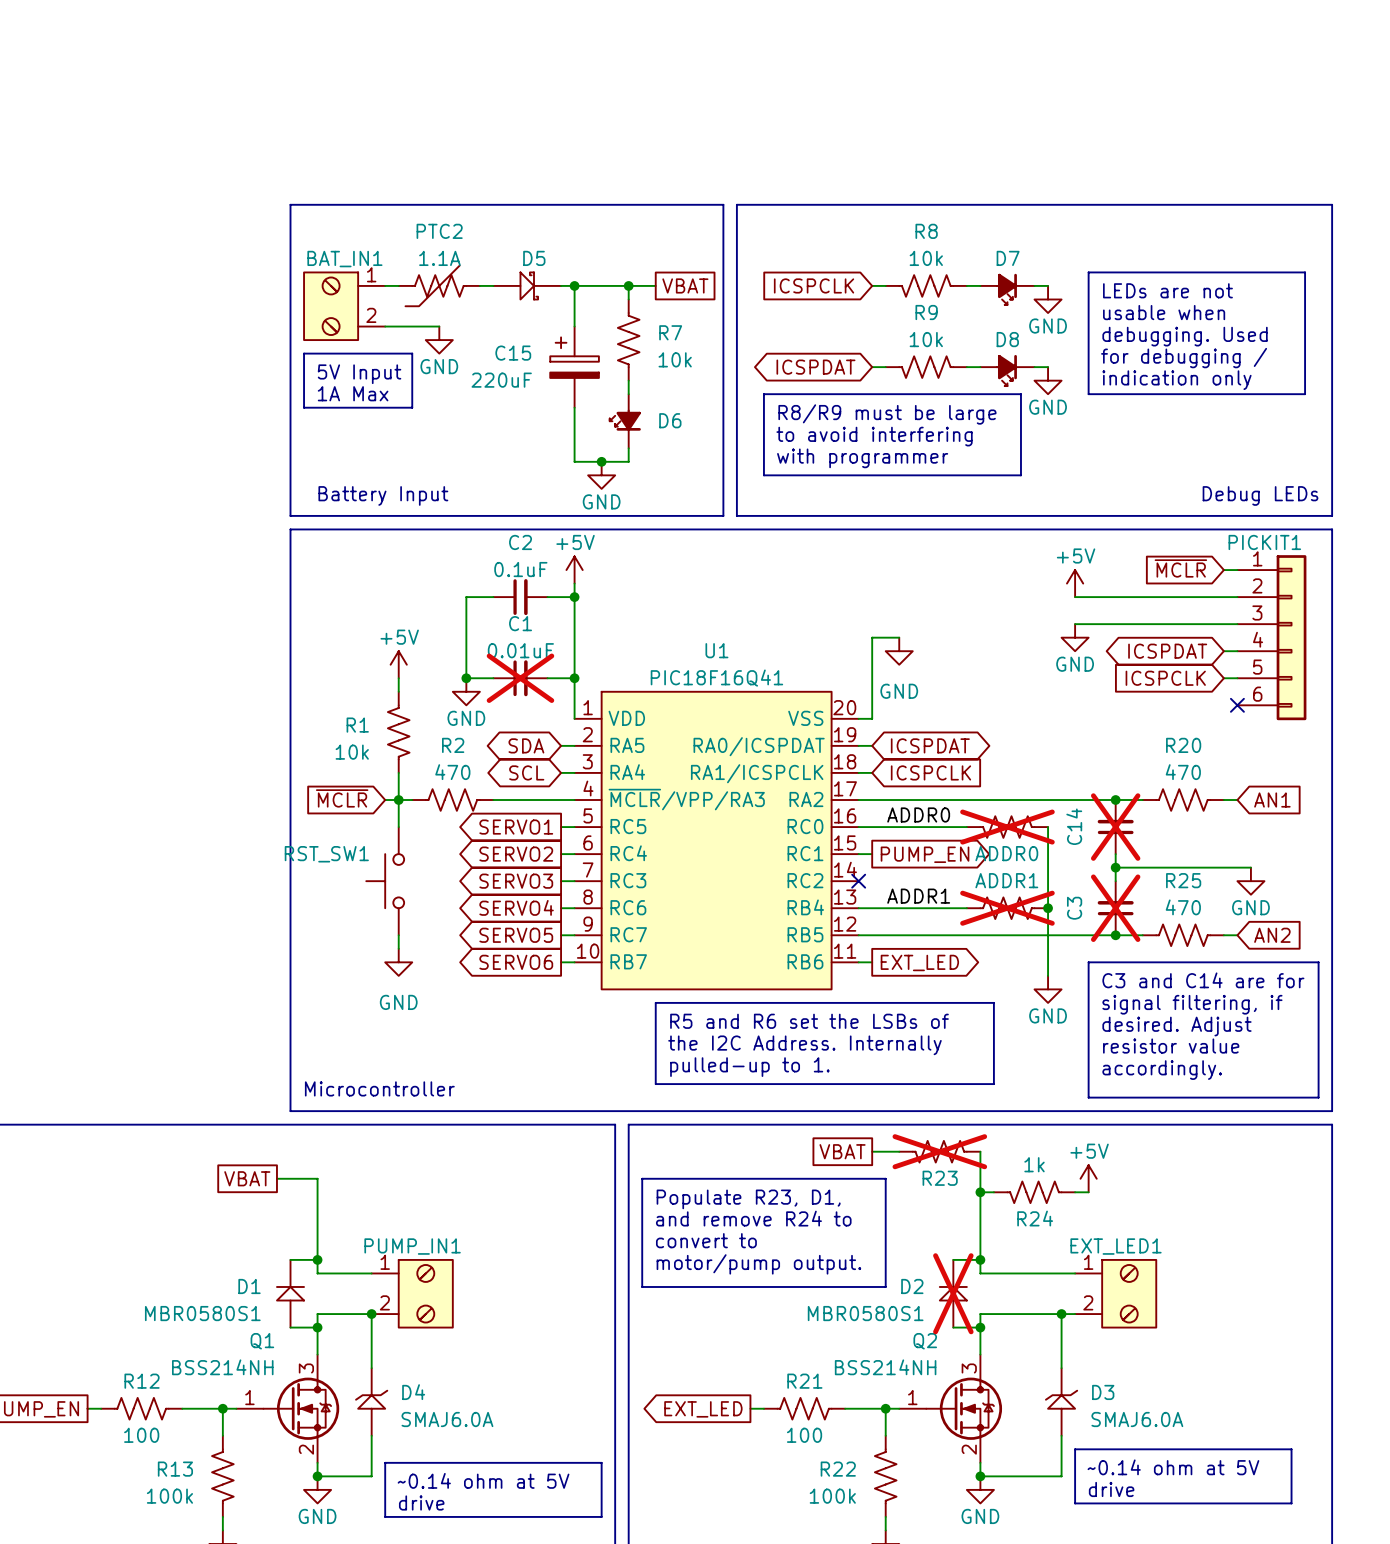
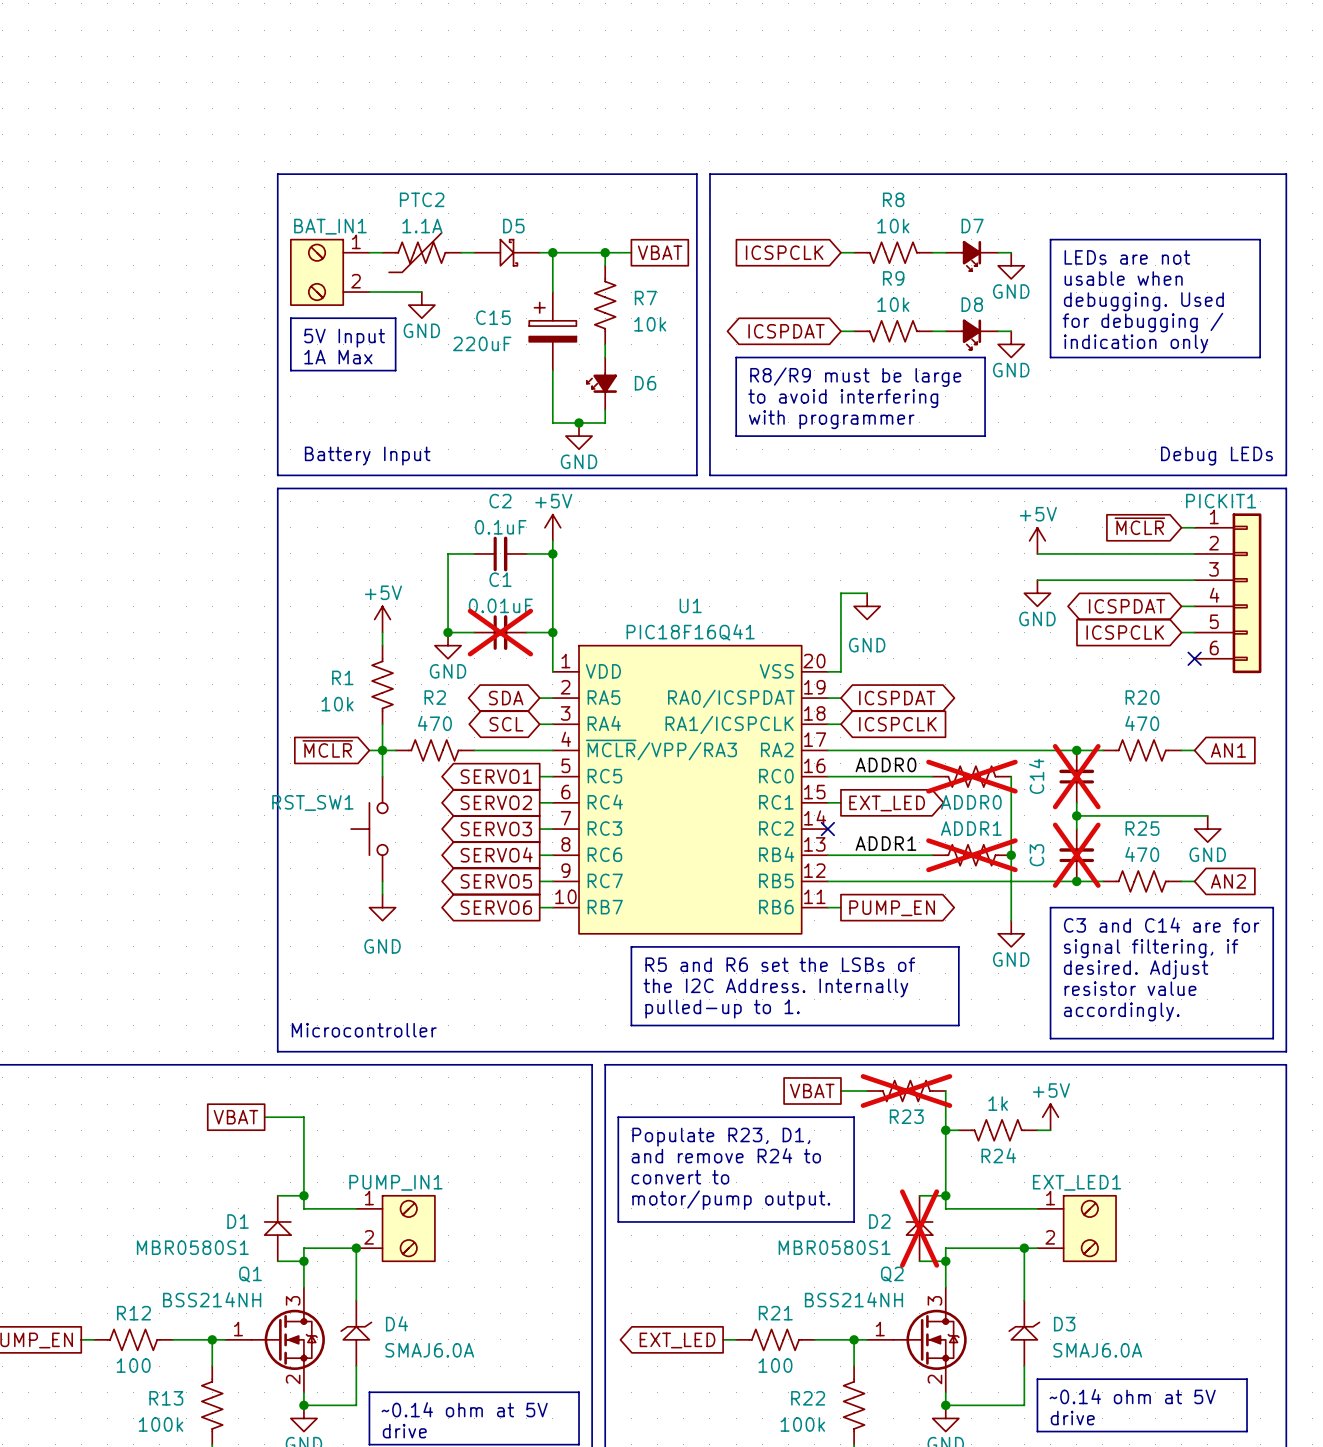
global label: PUMP_EN (925, 854) -> EXT_LED (887, 803)
global label: EXT_LED (919, 962) -> PUMP_EN (892, 908)

